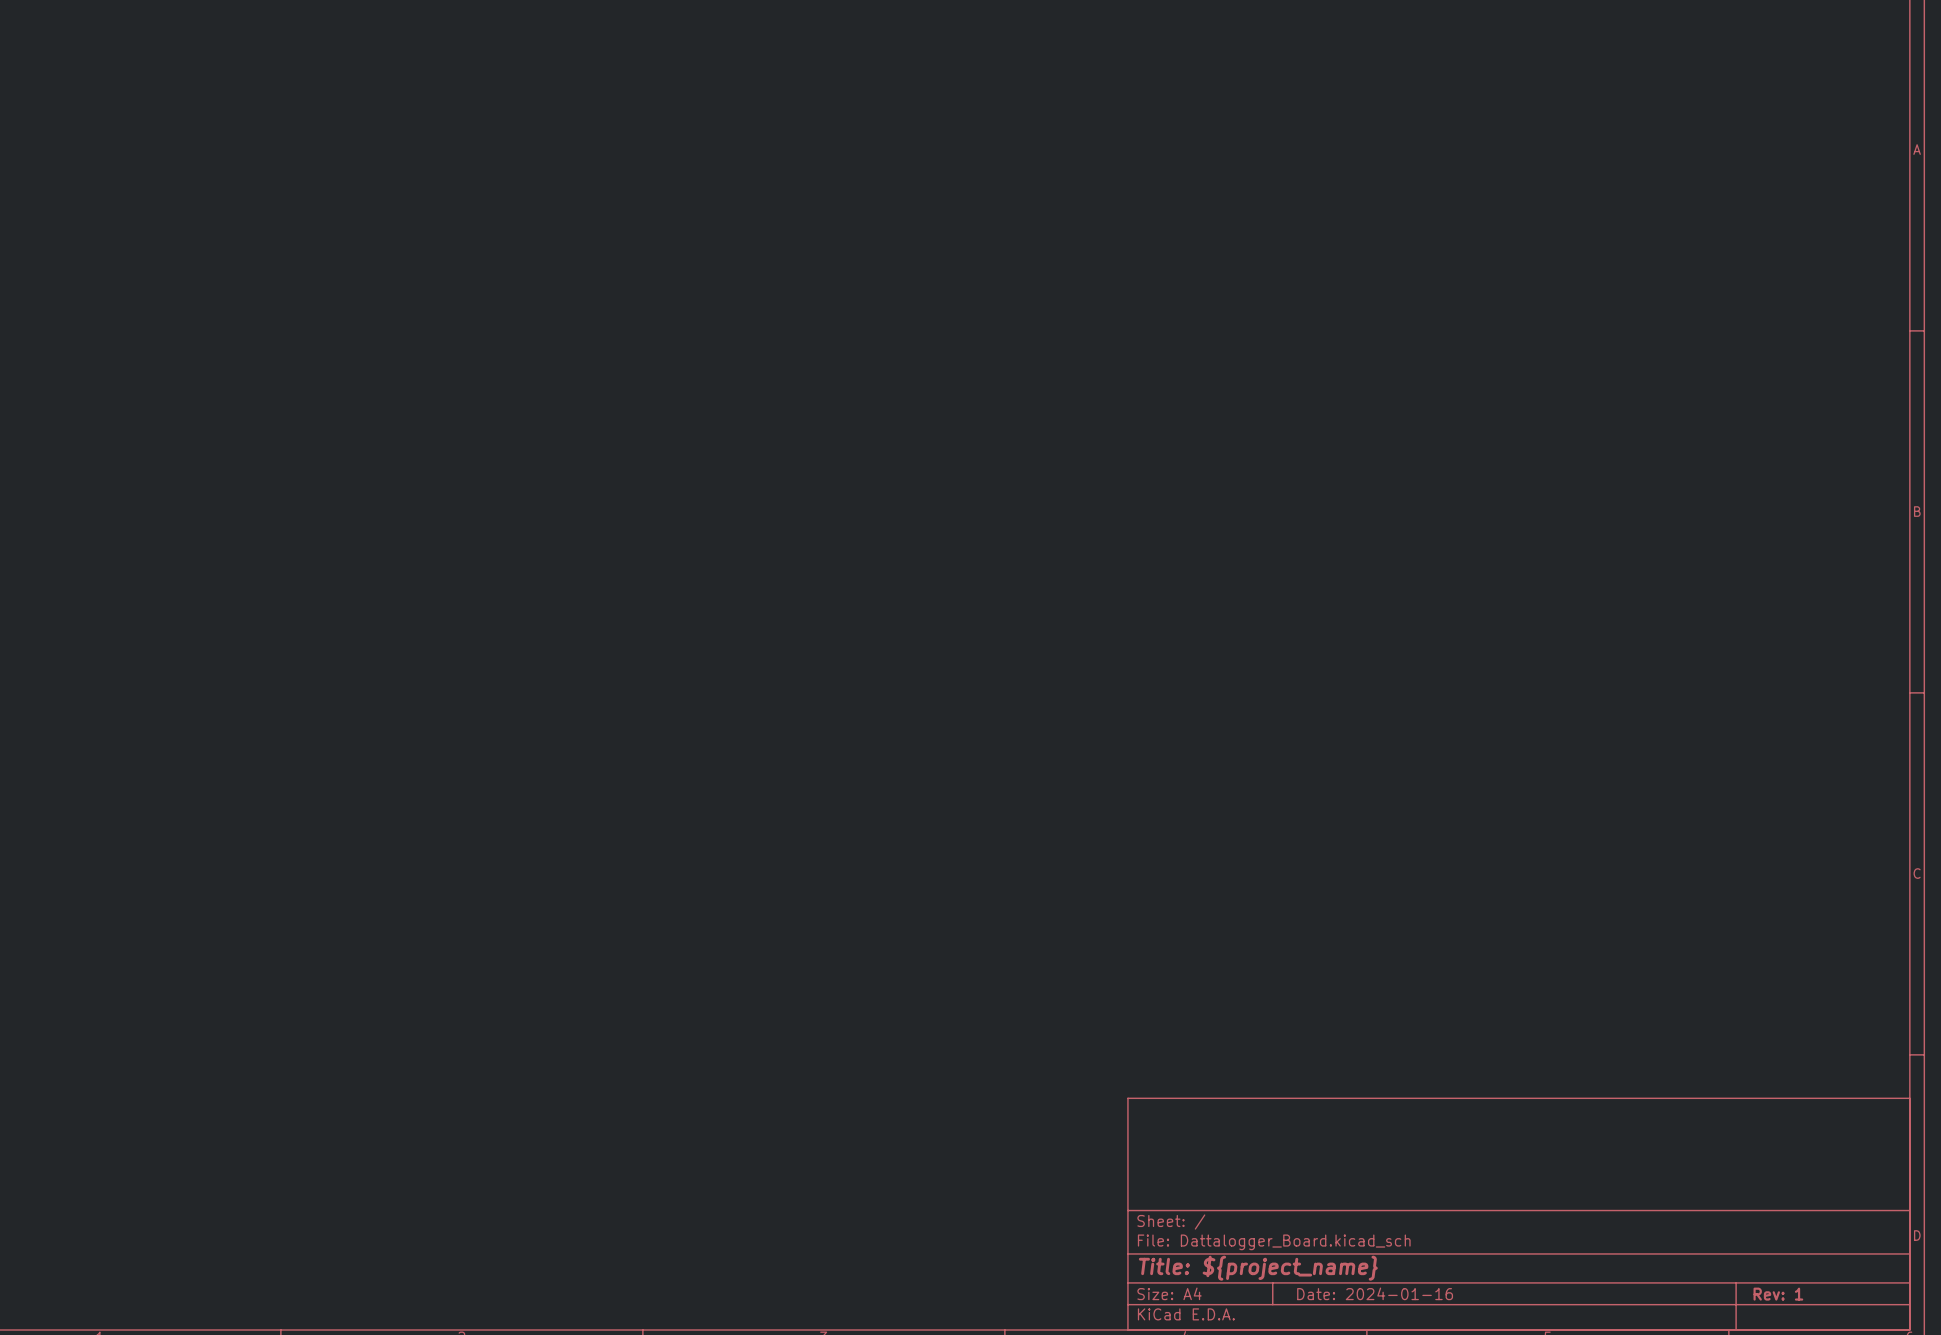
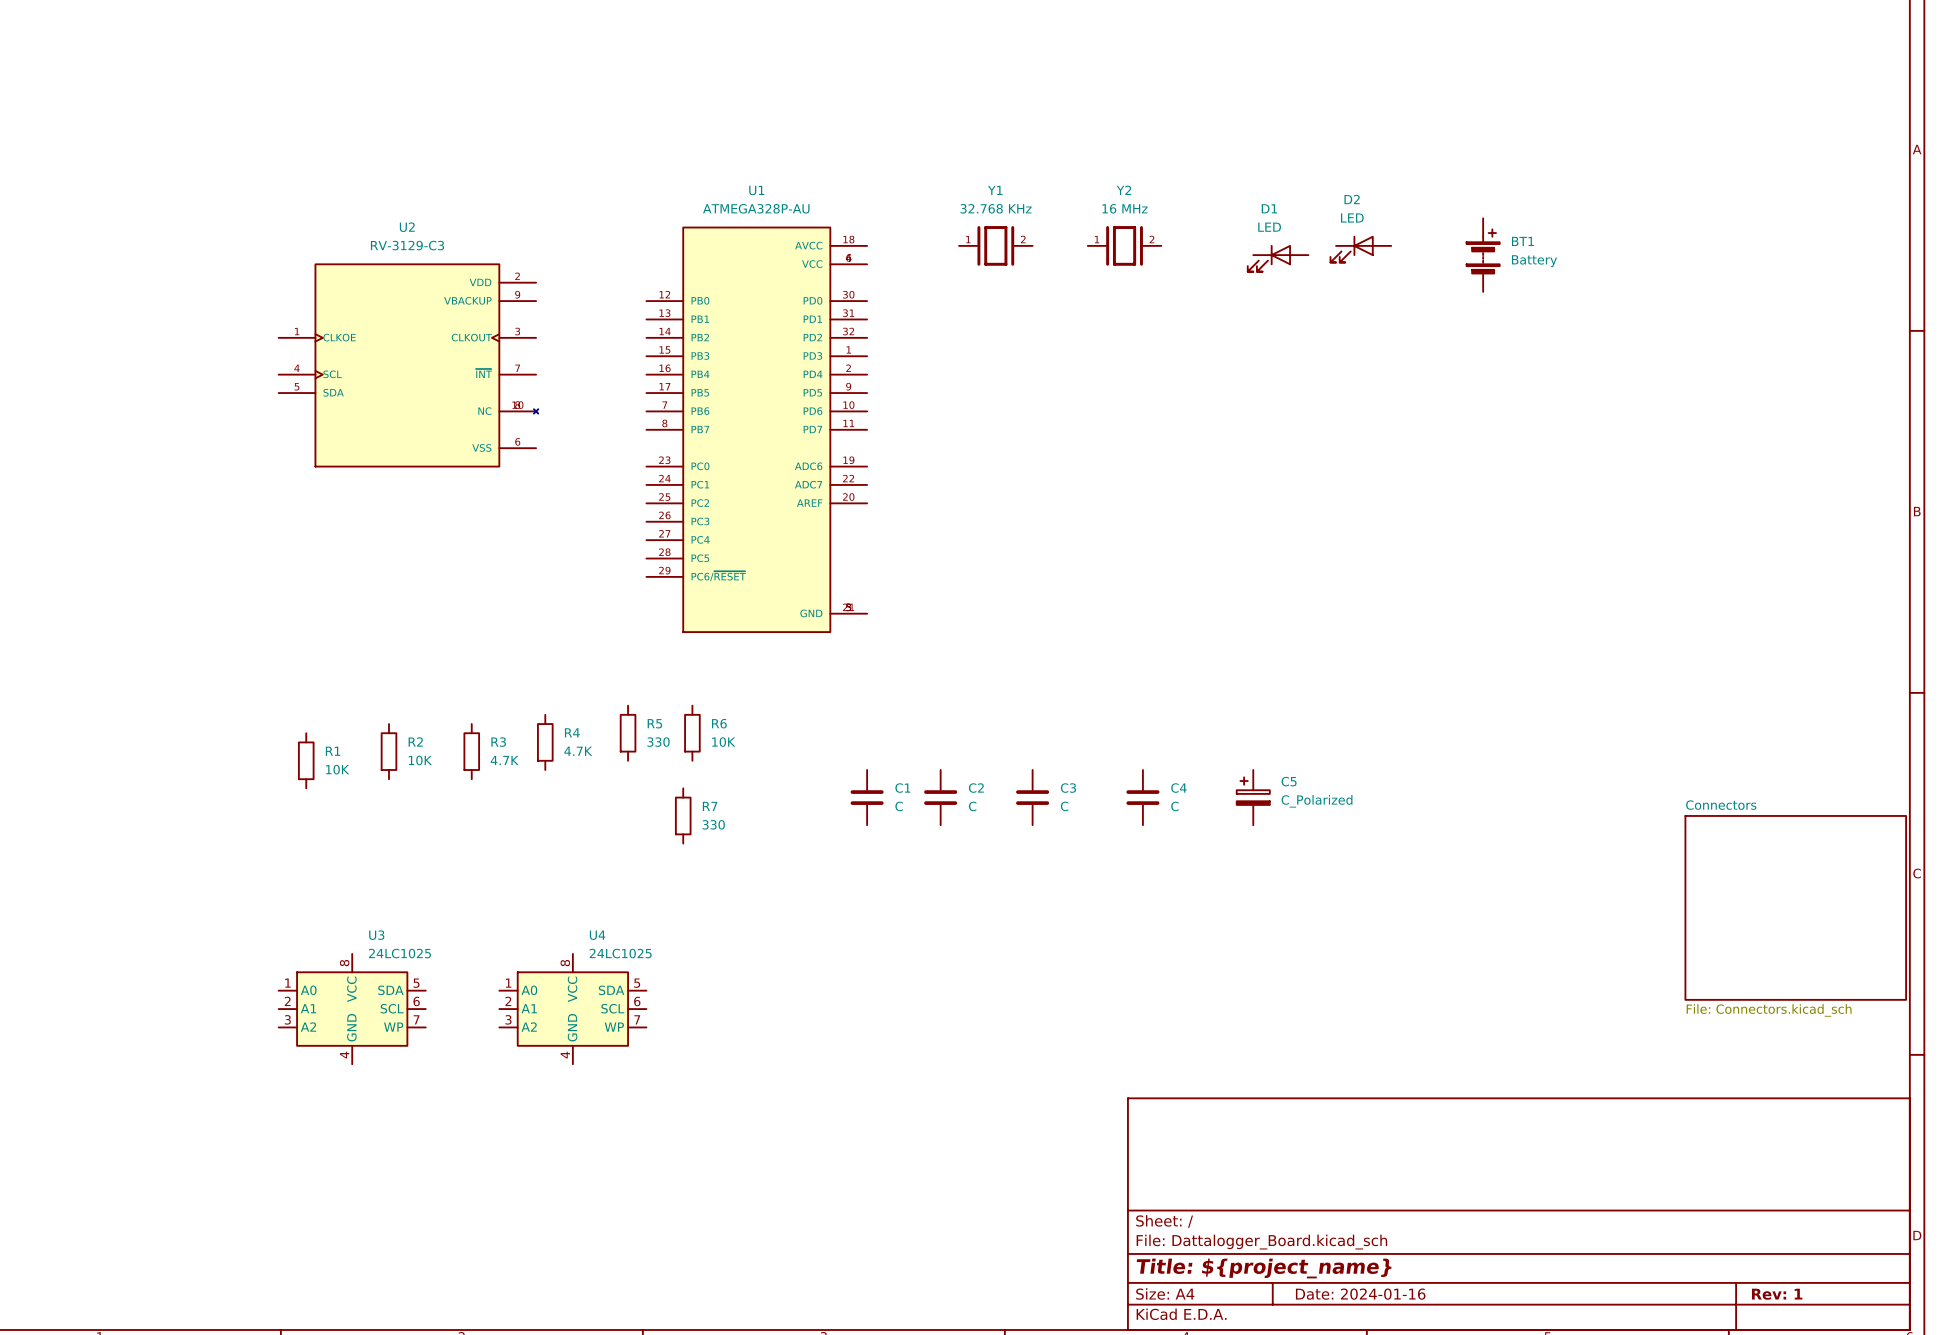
Y1: none -> 32.768 KHz (995, 245)
Y2: none -> 16 MHz (1124, 245)
D2: none -> LED (1360, 249)
BT1: none -> Battery (1483, 255)
D1: none -> LED (1278, 258)
U2: none -> RV-3129-C3 (408, 365)
U1: none -> ATMEGA328P-AU (756, 429)
R5: none -> 330 (628, 733)
R6: none -> 10K (692, 733)
R4: none -> 4.7K (545, 742)
R2: none -> 10K (388, 751)
R3: none -> 4.7K (471, 751)
R1: none -> 10K (306, 760)
C1: none -> C (867, 797)
C2: none -> C (940, 797)
C3: none -> C (1032, 797)
C4: none -> C (1142, 797)
C5: none -> C_Polarized (1253, 797)
R7: none -> 330 (683, 815)
sheet Connectors: none -> File: Connectors.kicad_sch (1795, 907)
U3: none -> 24LC1025 (352, 1009)
U4: none -> 24LC1025 (572, 1009)

